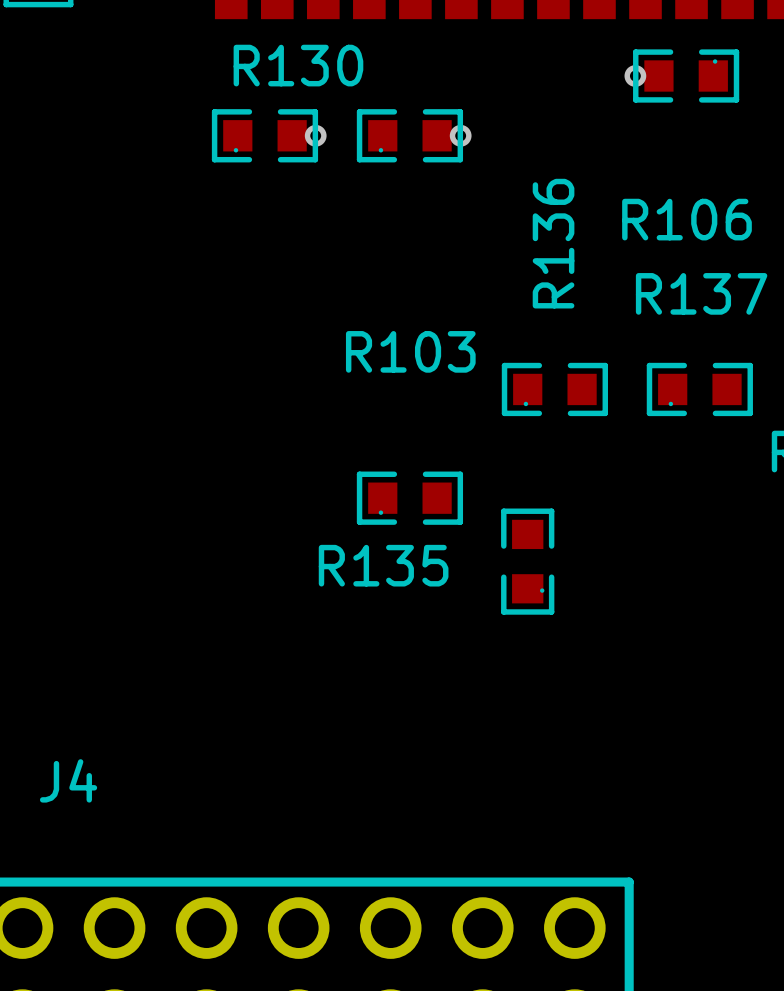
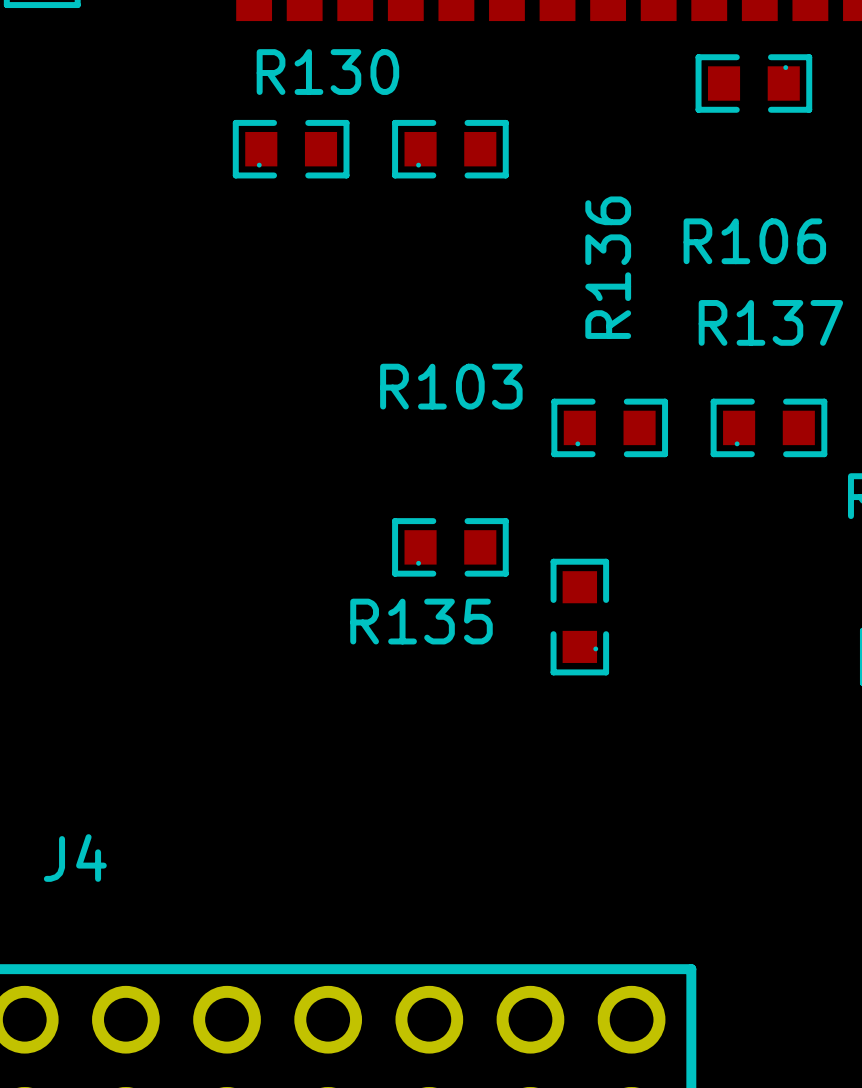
via: (635, 75) -> none
via: (315, 135) -> none
via: (460, 135) -> none

